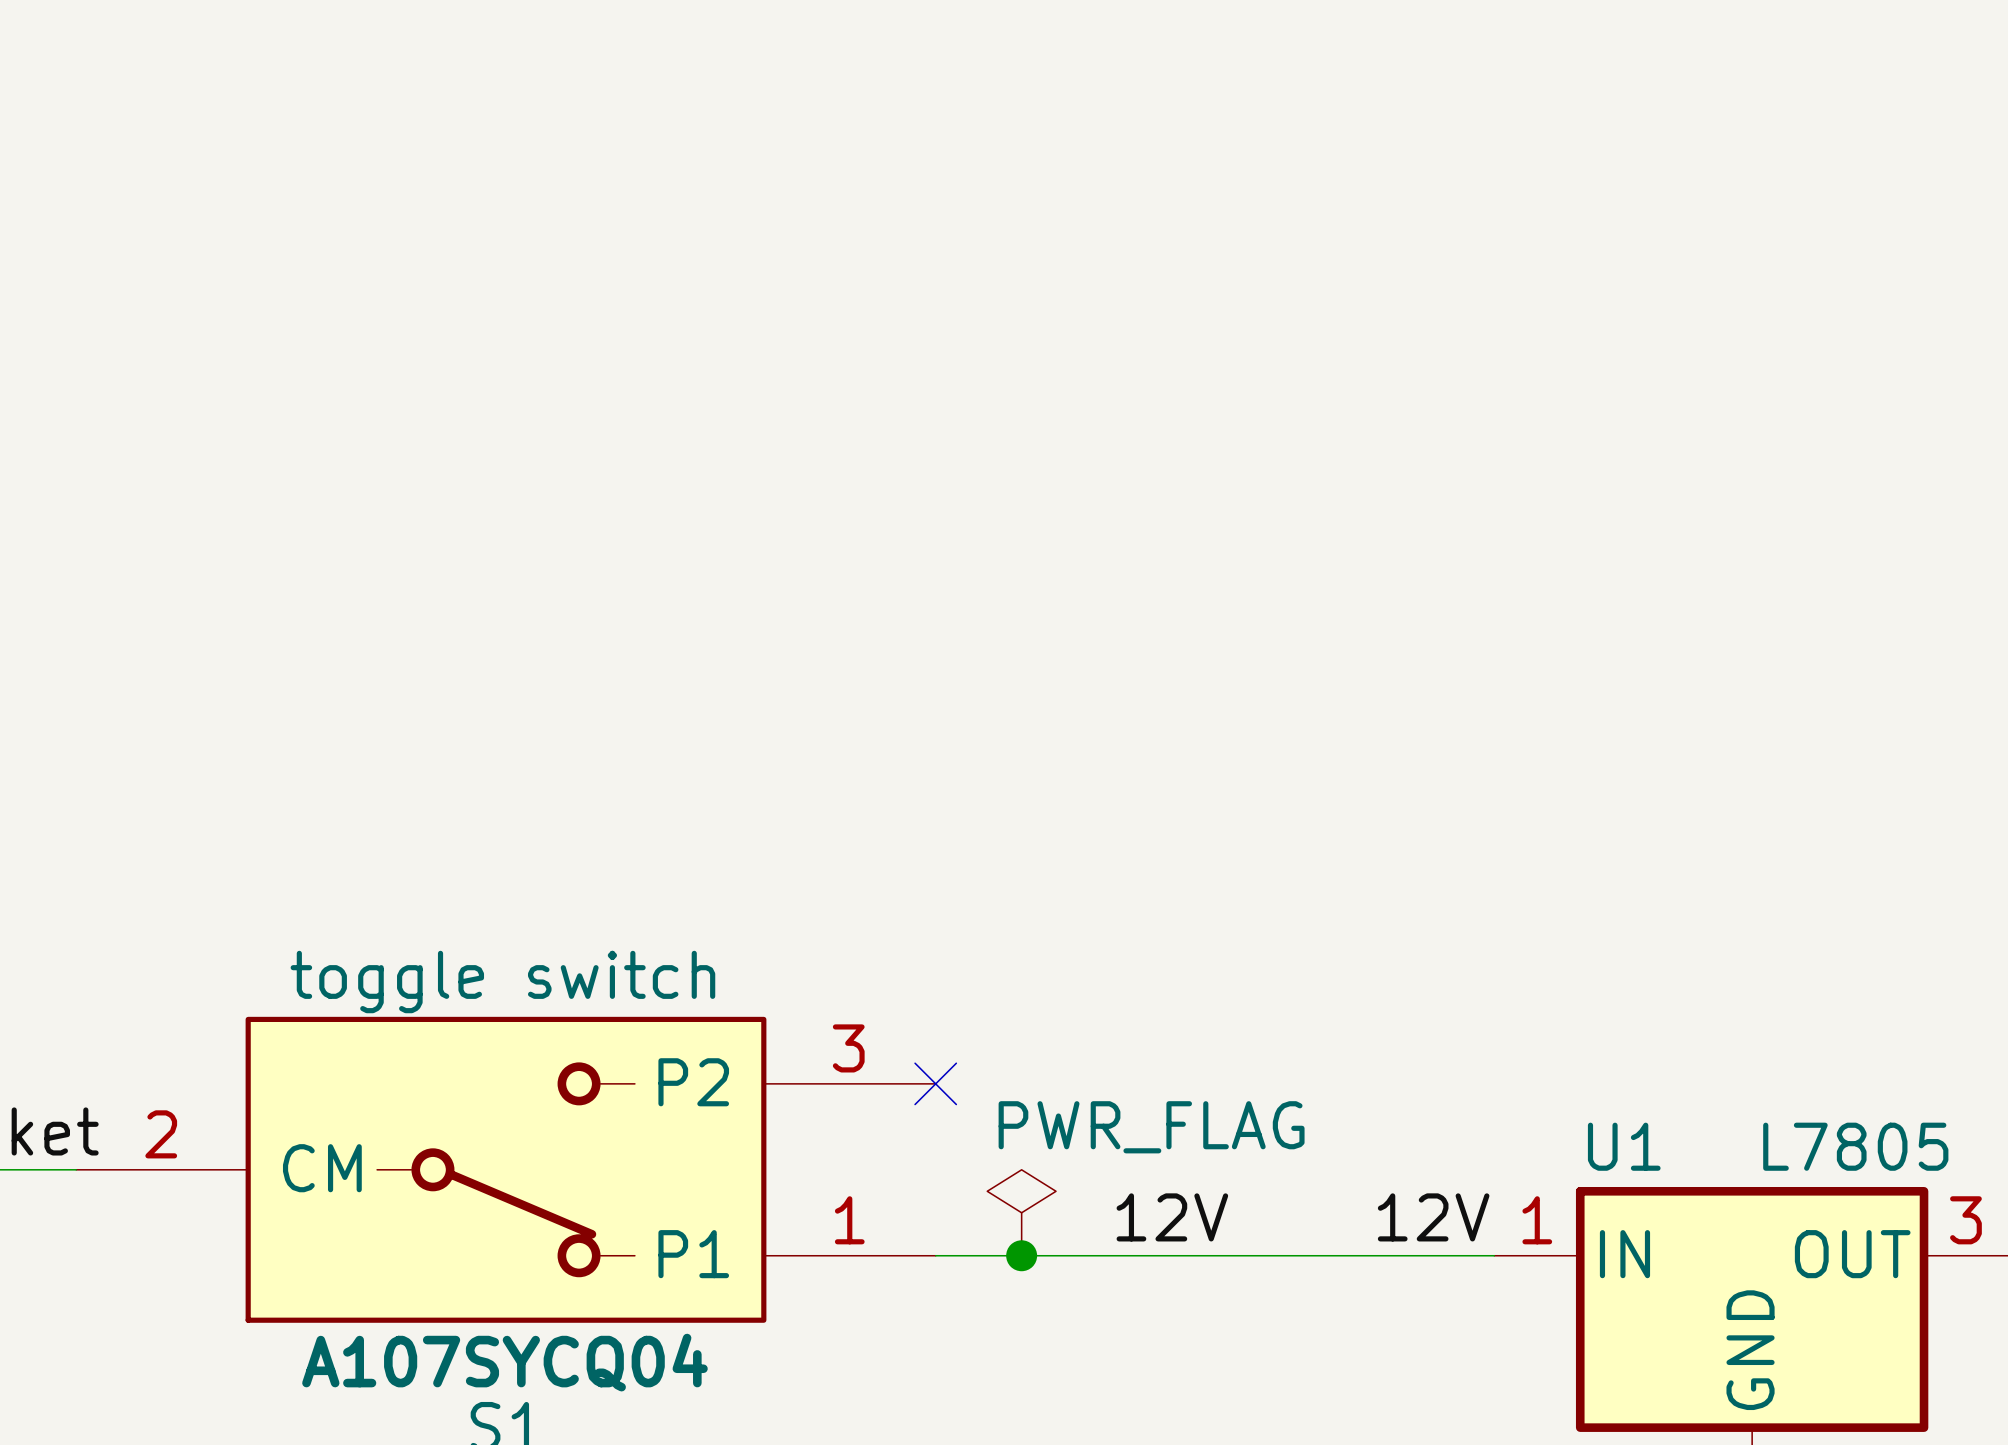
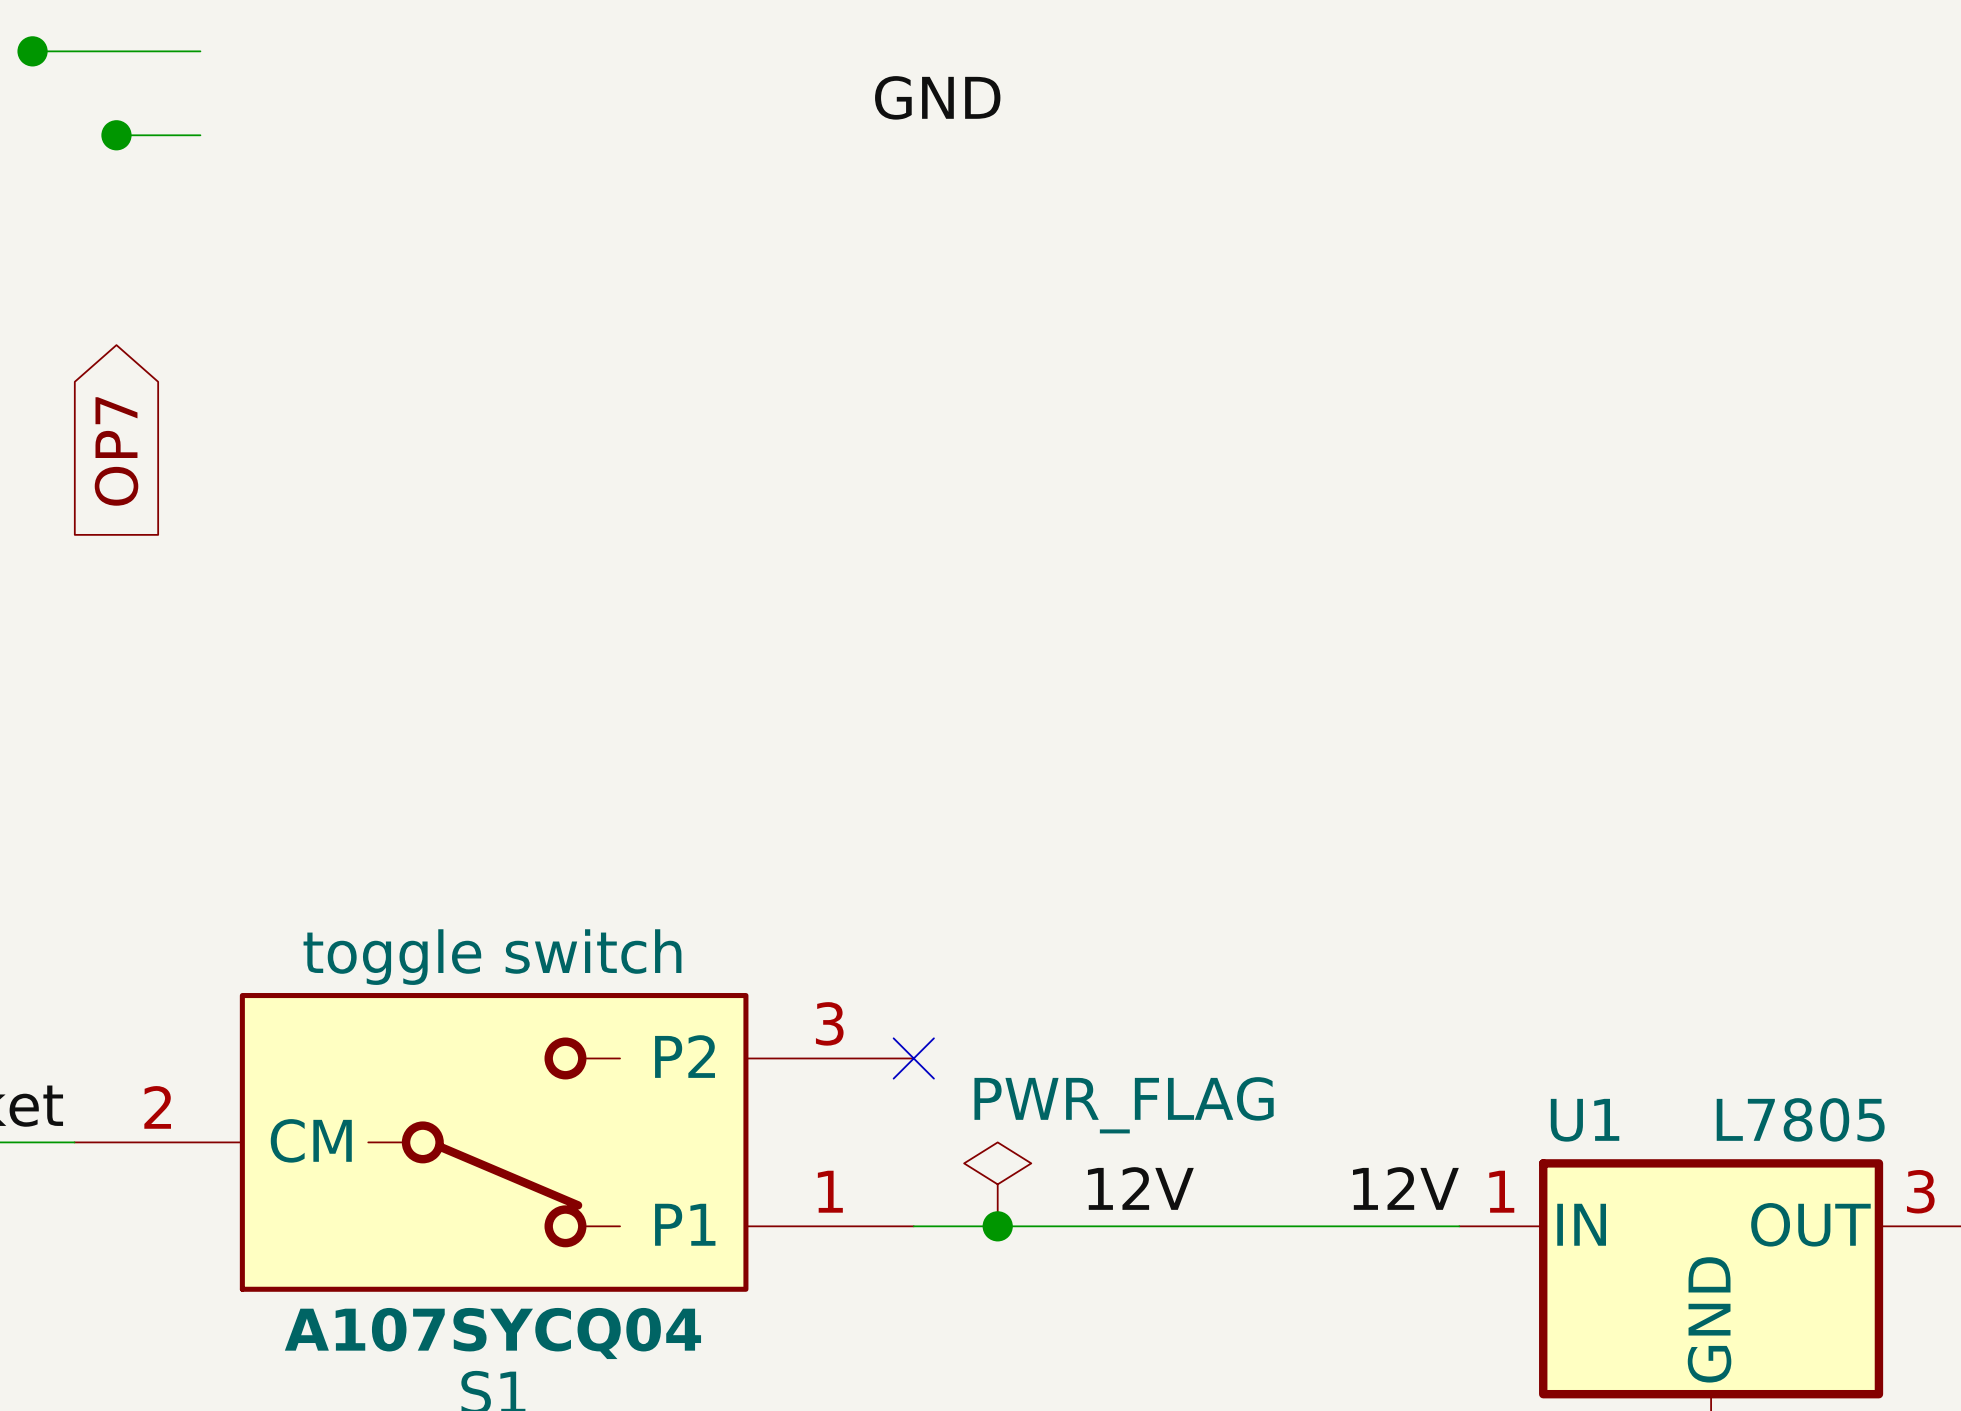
wire: none -> (32, 51) (200, 51)
junction: none -> (32, 51)
label: none -> GND (937, 97)
wire: none -> (116, 135) (200, 135)
junction: none -> (116, 135)
global label: none -> OP7 (116, 451)

